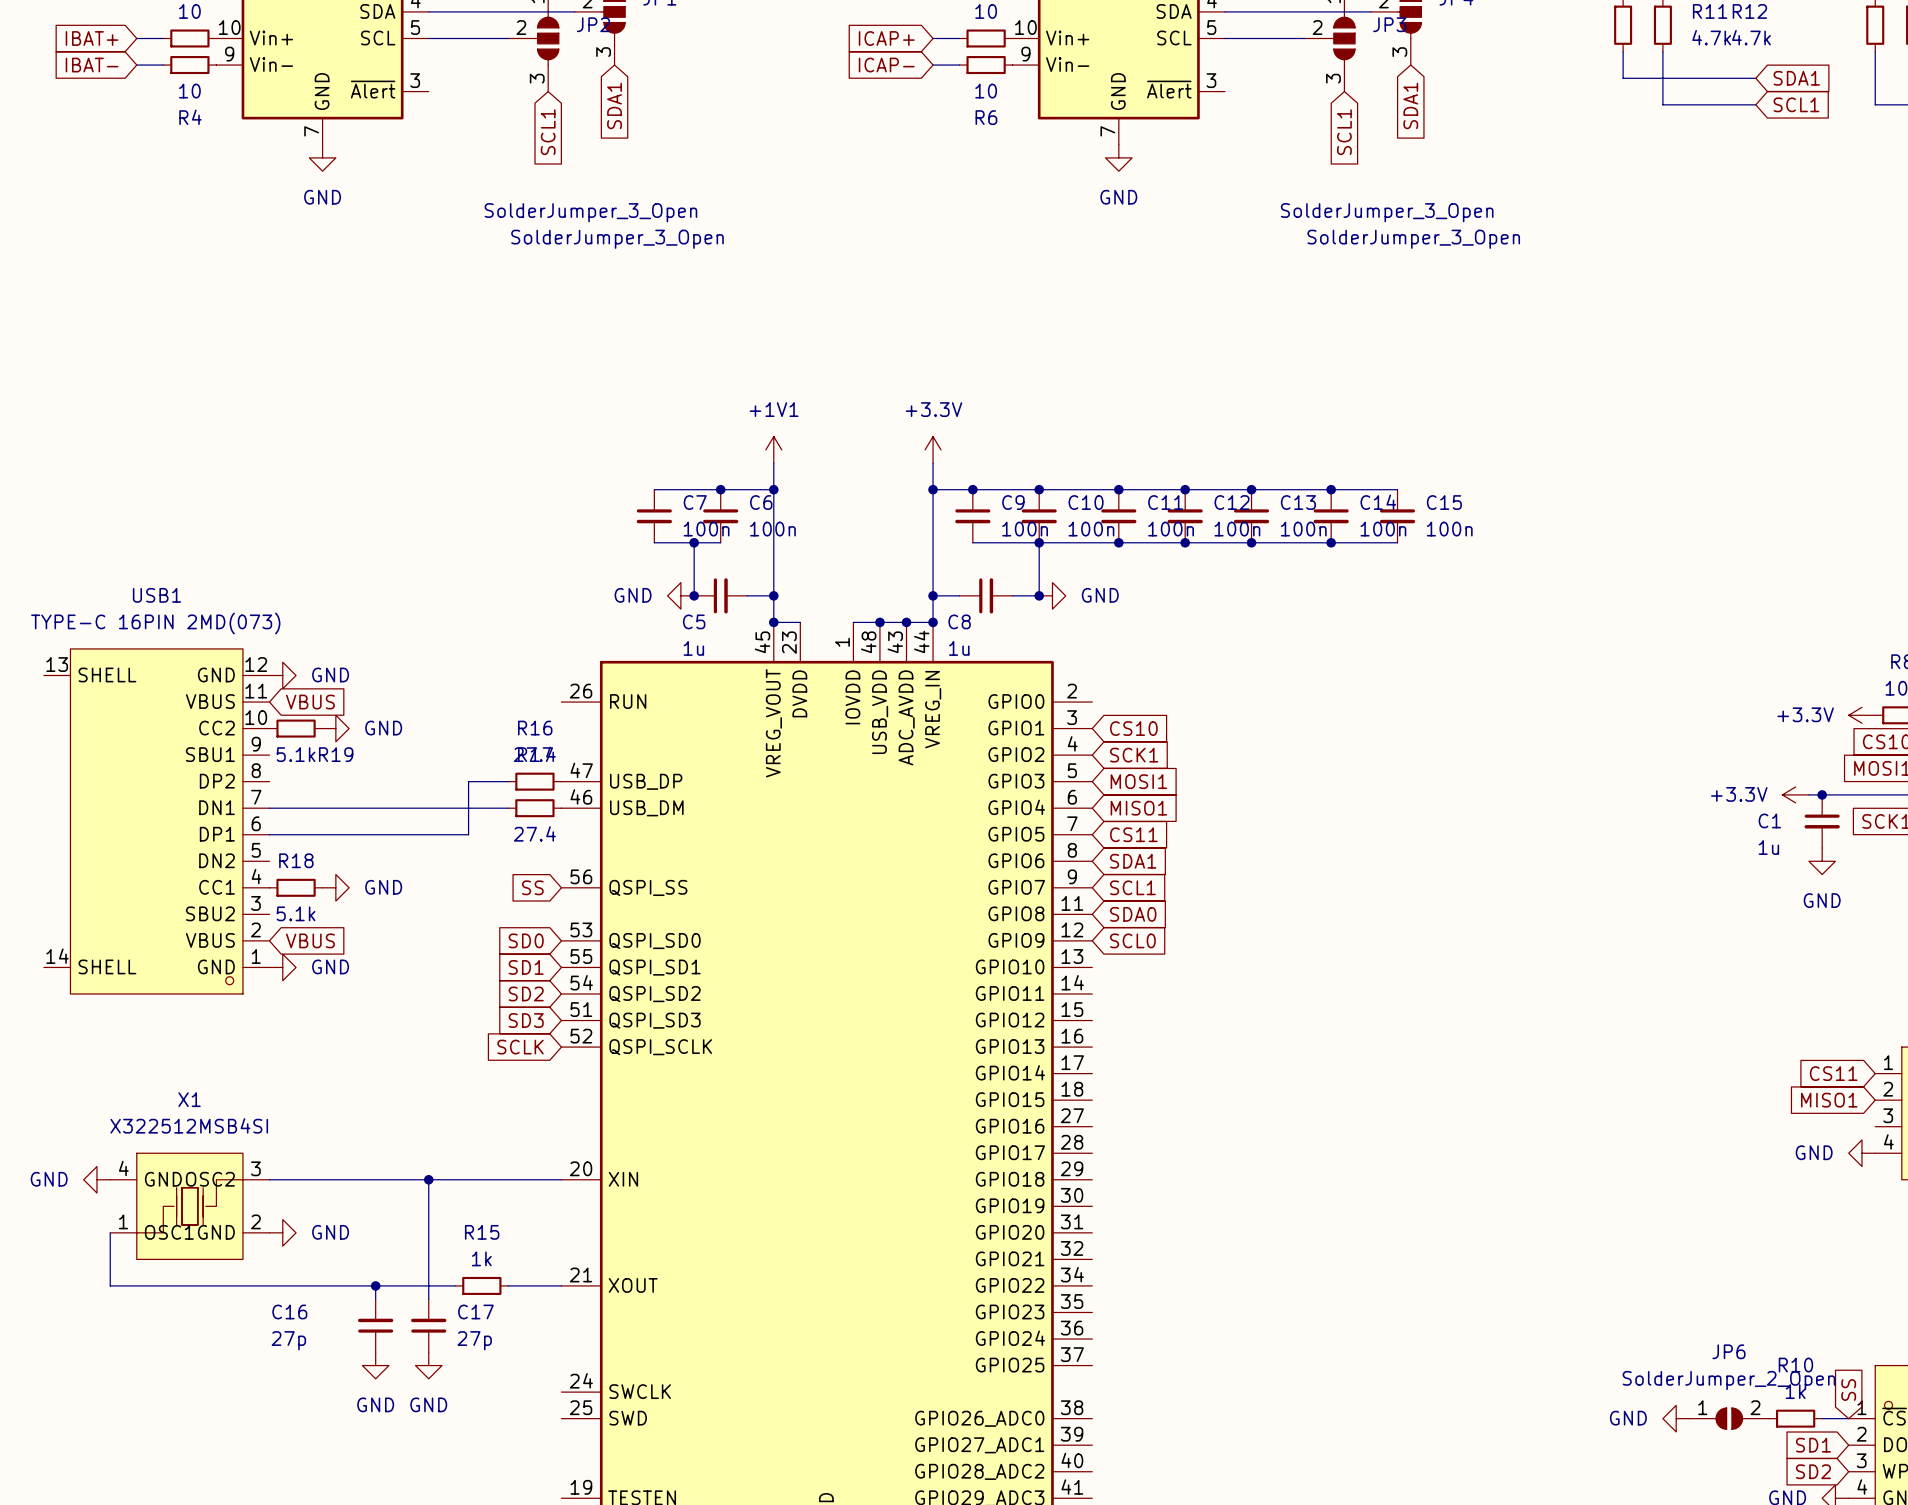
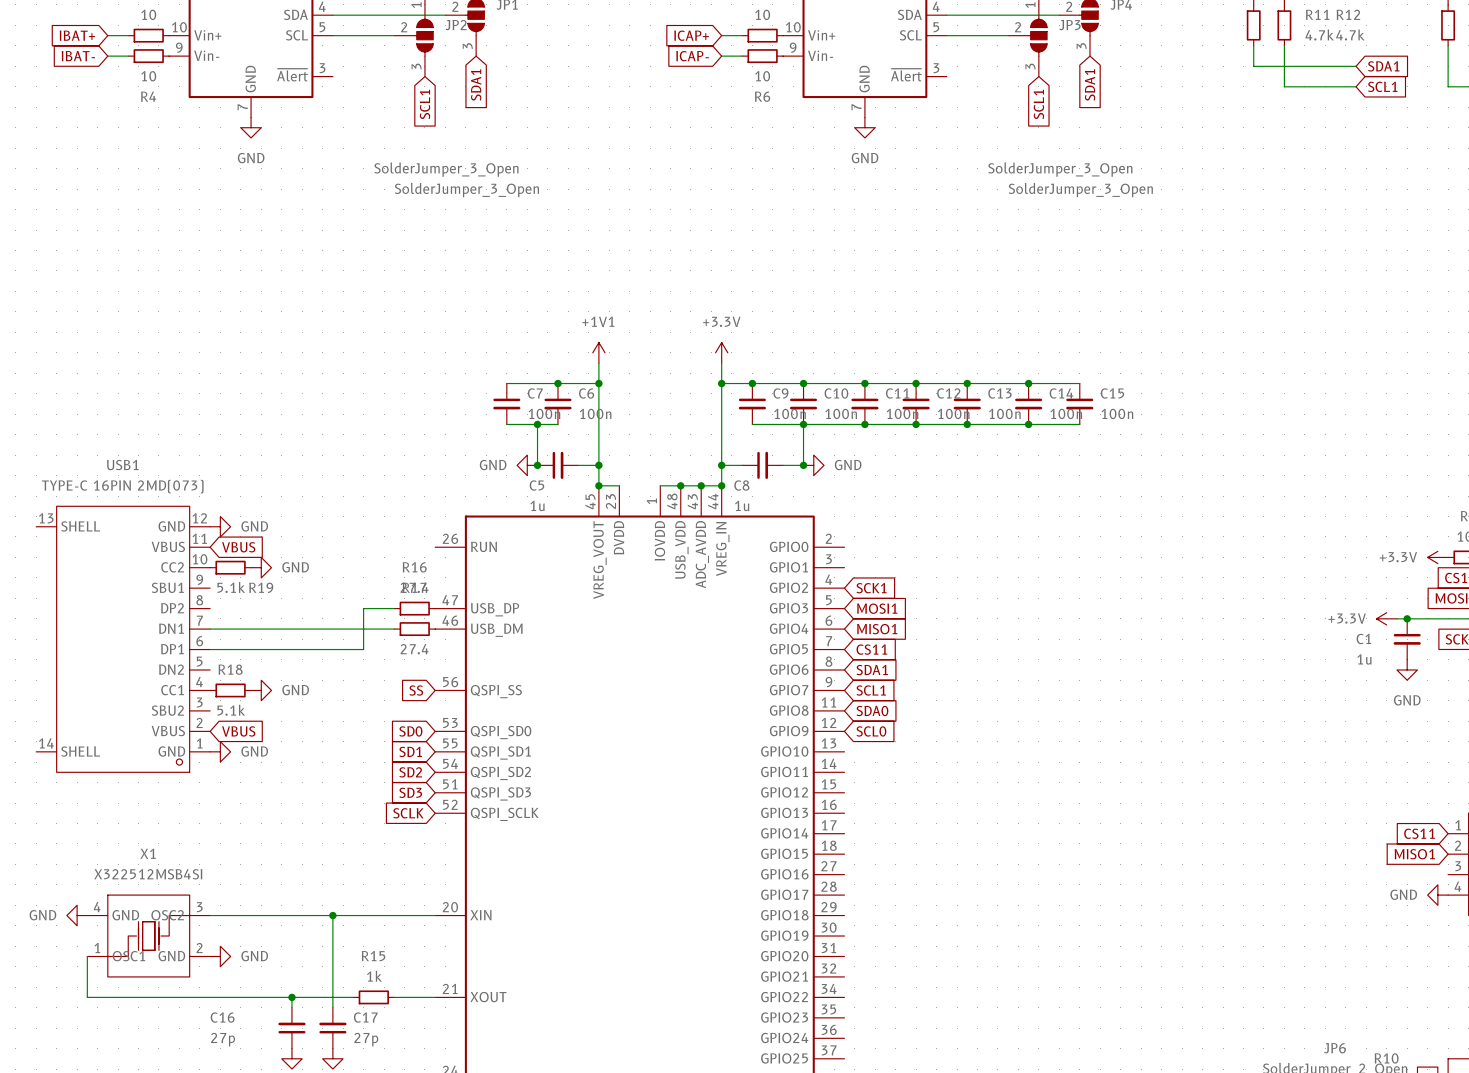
global label: CS10 (1133, 728) -> none

